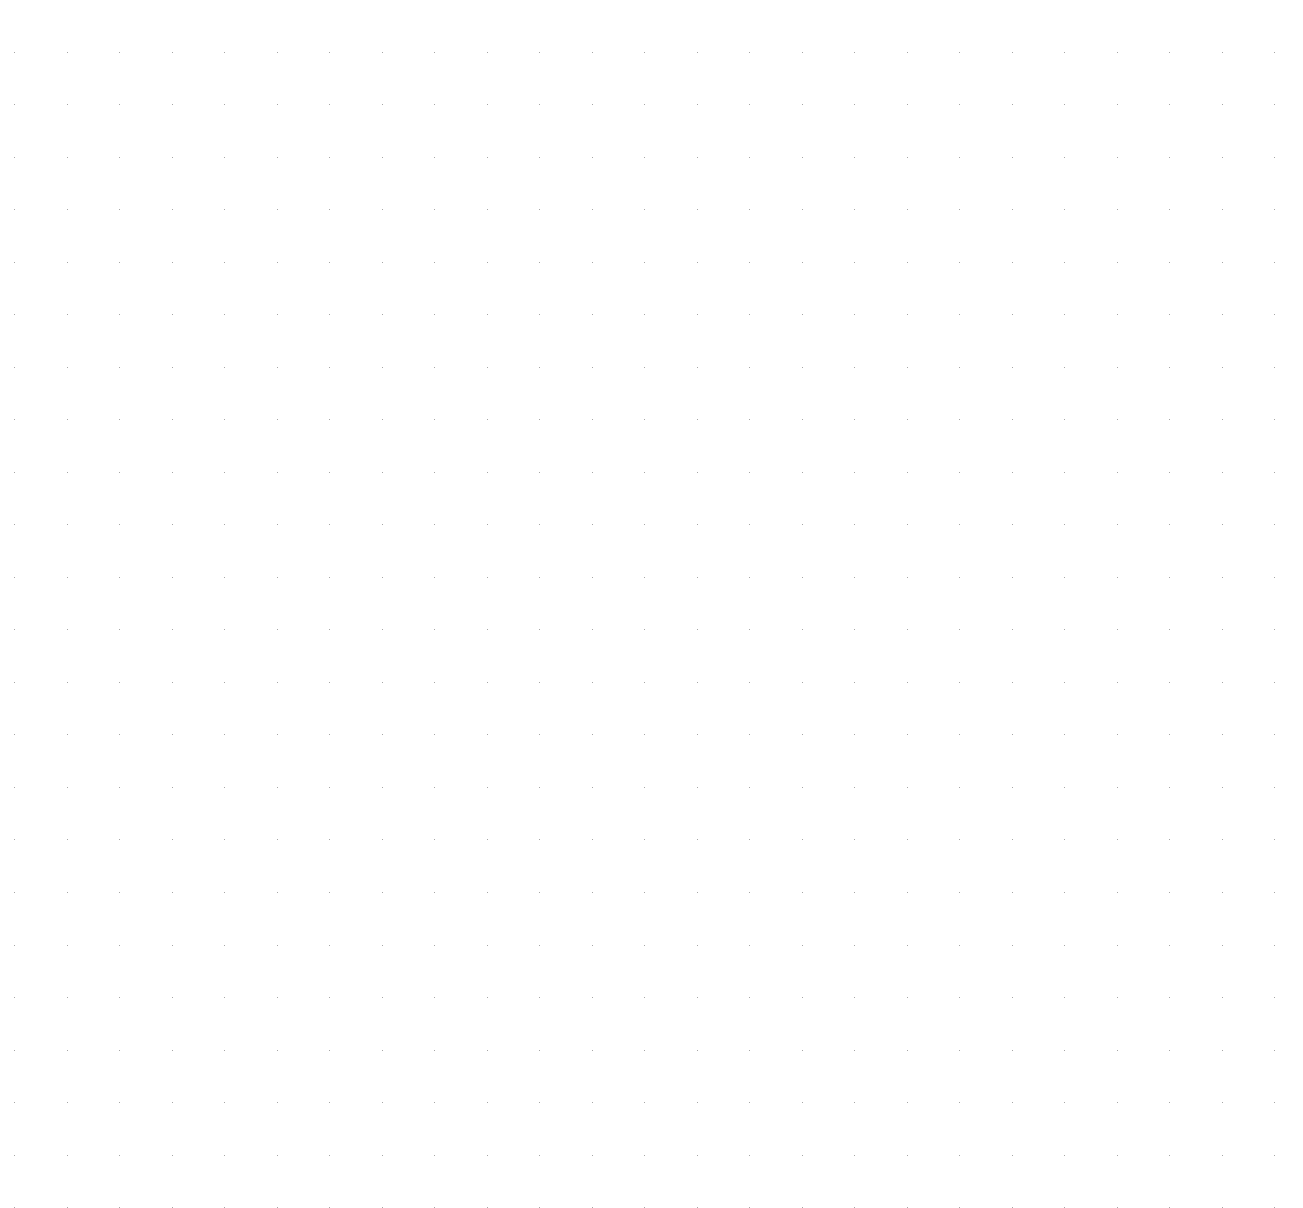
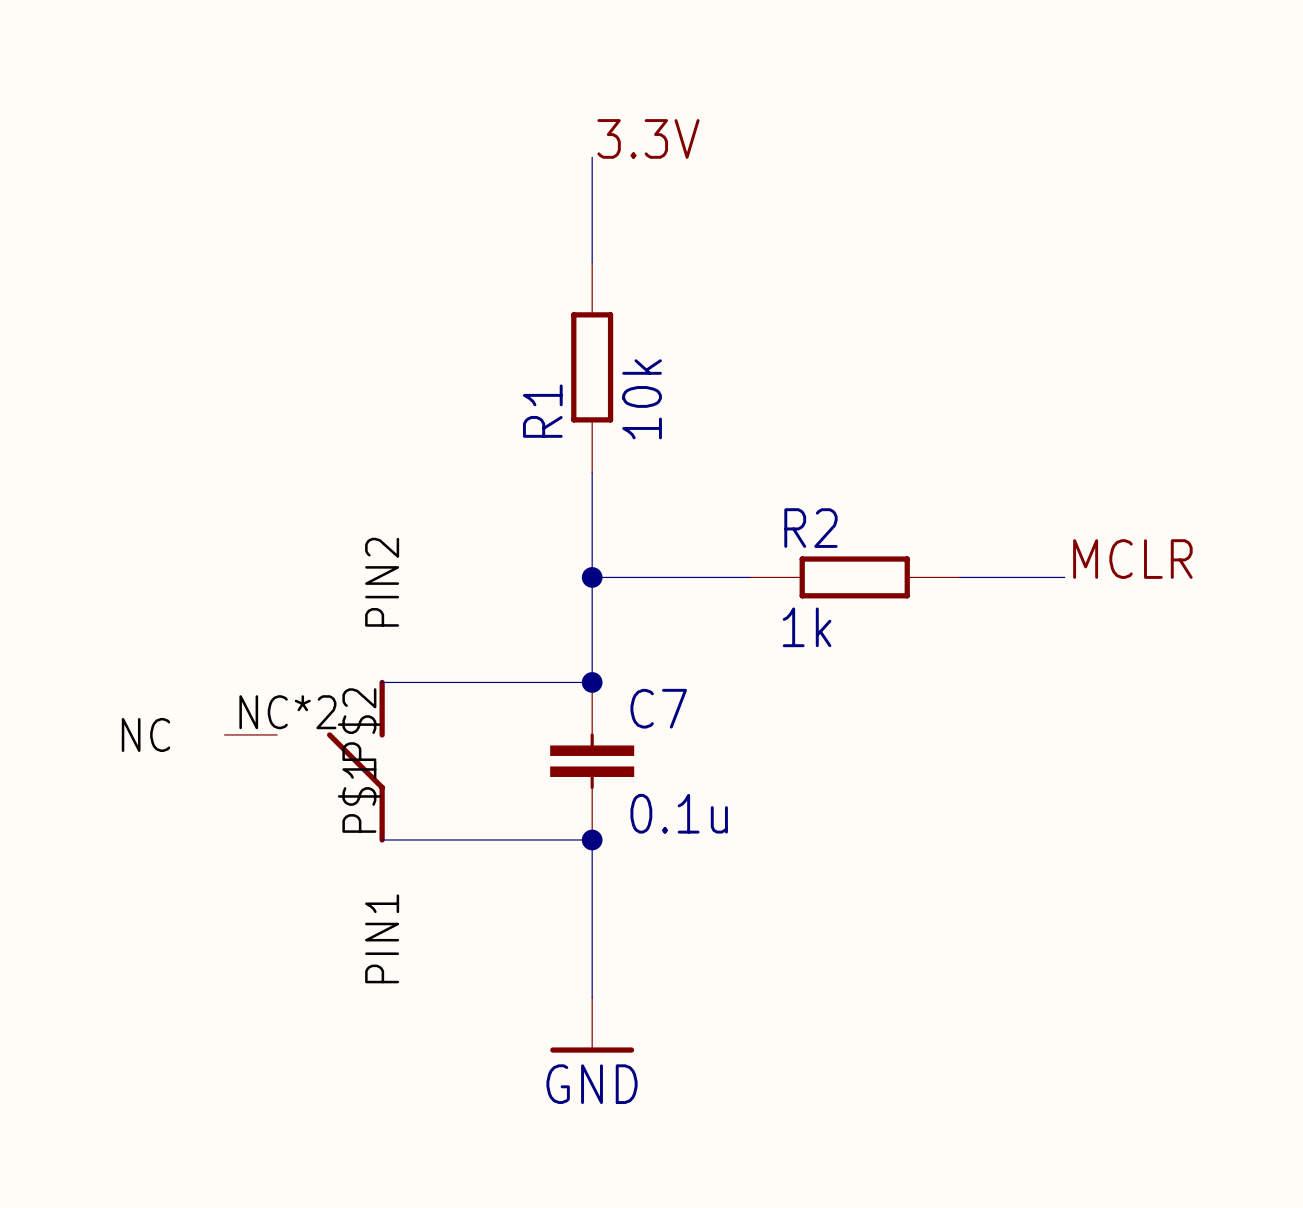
label: none -> 3.3V (648, 138)
wire: none -> (592, 157) (592, 262)
R1: none -> 10k (592, 367)
wire: none -> (592, 472) (592, 682) (382, 682)
label: none -> MCLR (1132, 559)
wire: none -> (592, 577) (749, 577)
junction: none -> (592, 577)
R2: none -> 1k (854, 577)
wire: none -> (959, 577) (1064, 577)
junction: none -> (592, 682)
part: none -> (304, 761)
C7: none -> 0.1u (592, 761)
wire: none -> (382, 839) (592, 839) (592, 997)
junction: none -> (592, 839)
power symbol: none -> GND (592, 1025)

